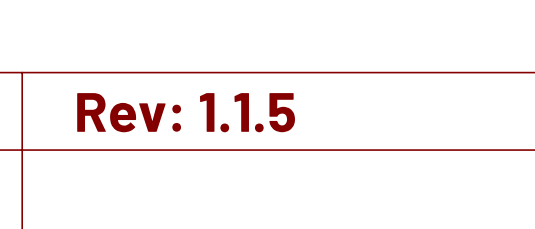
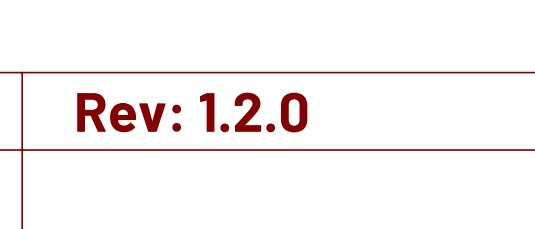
title block: Rev: 1.1.5 (186, 112) -> Rev: 1.2.0 (192, 112)

